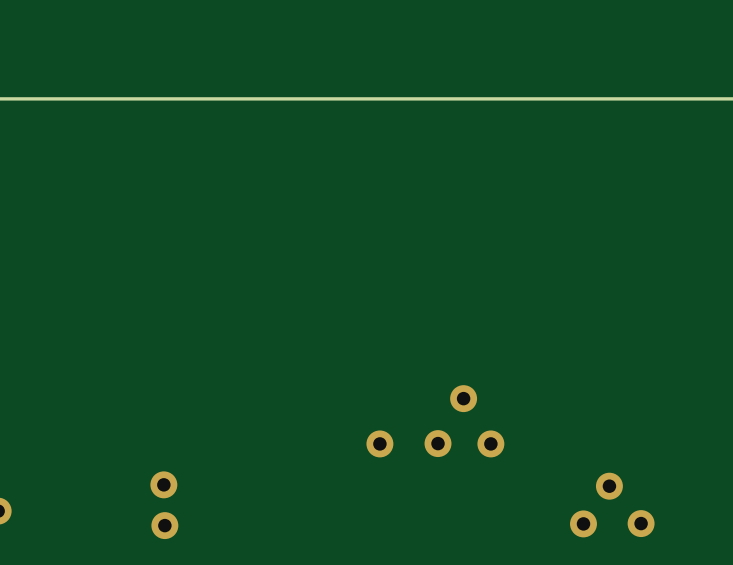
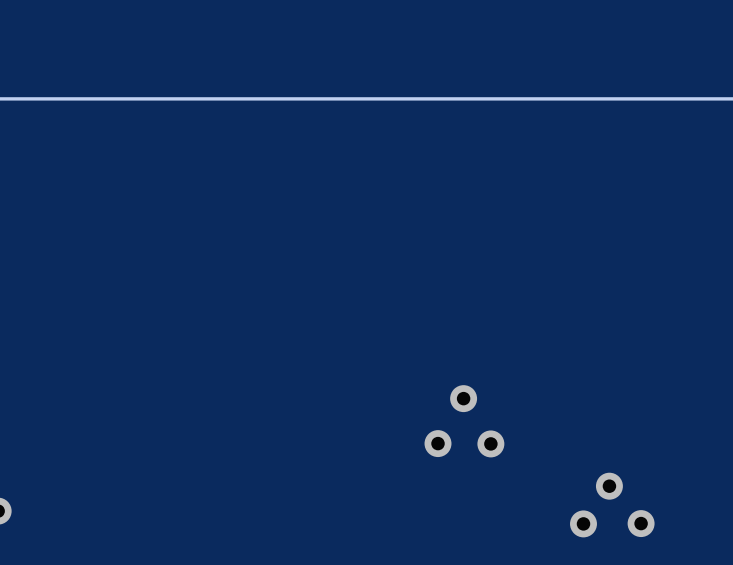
via: (379, 443) -> none
via: (163, 484) -> none
via: (164, 525) -> none

